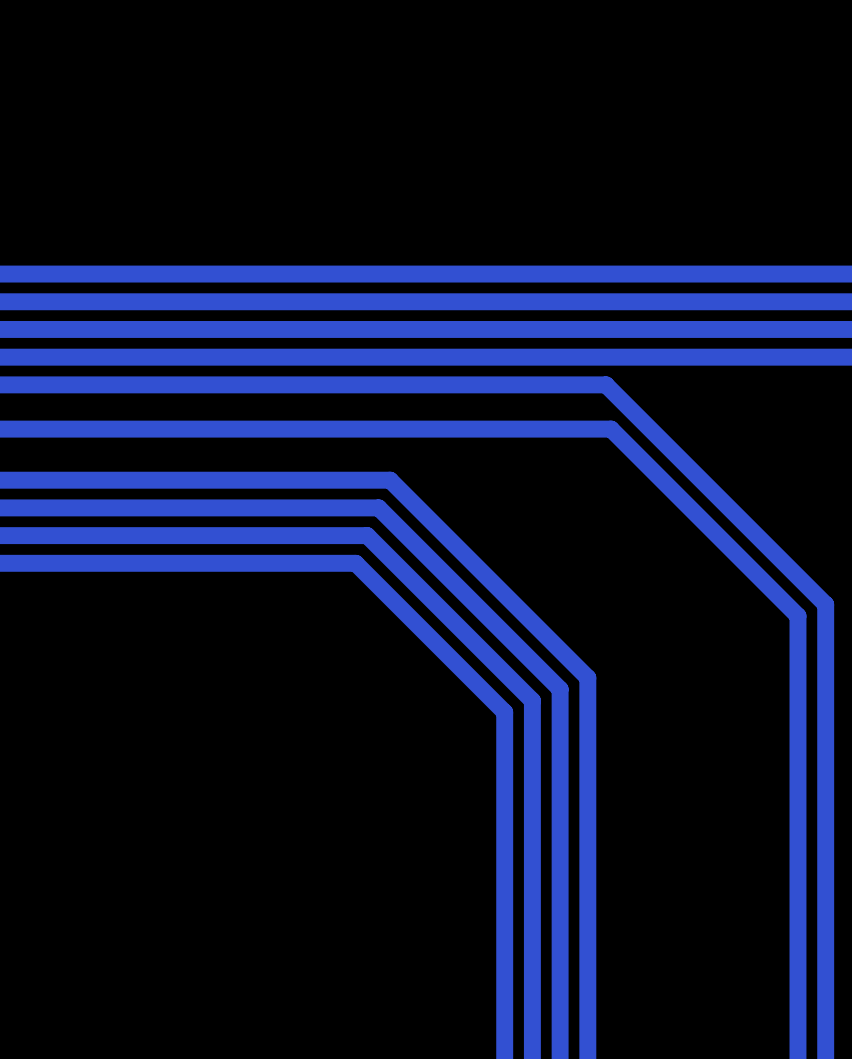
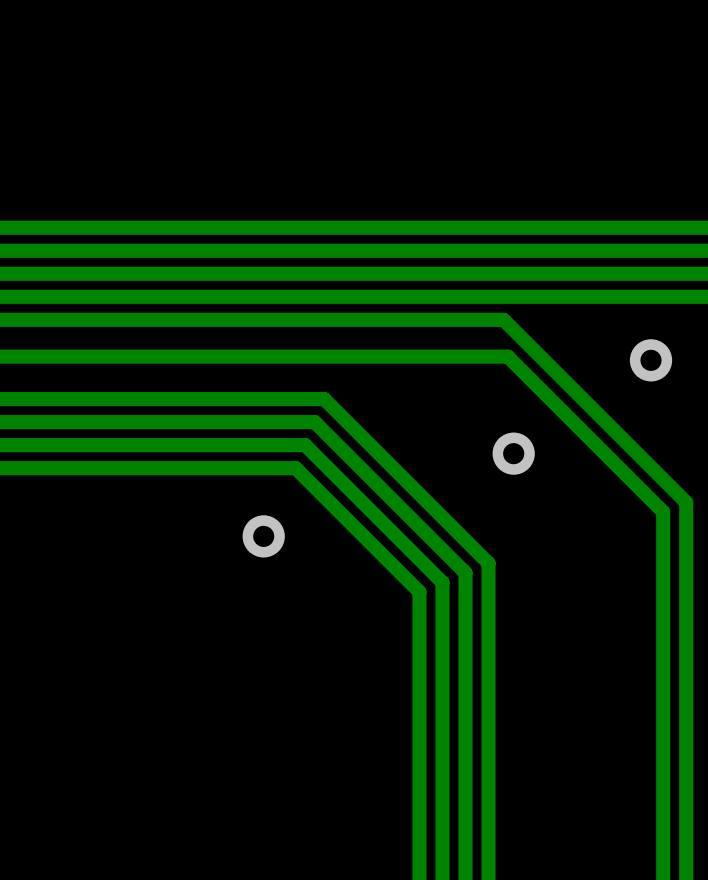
via: none -> (651, 360)
via: none -> (513, 453)
via: none -> (263, 536)

